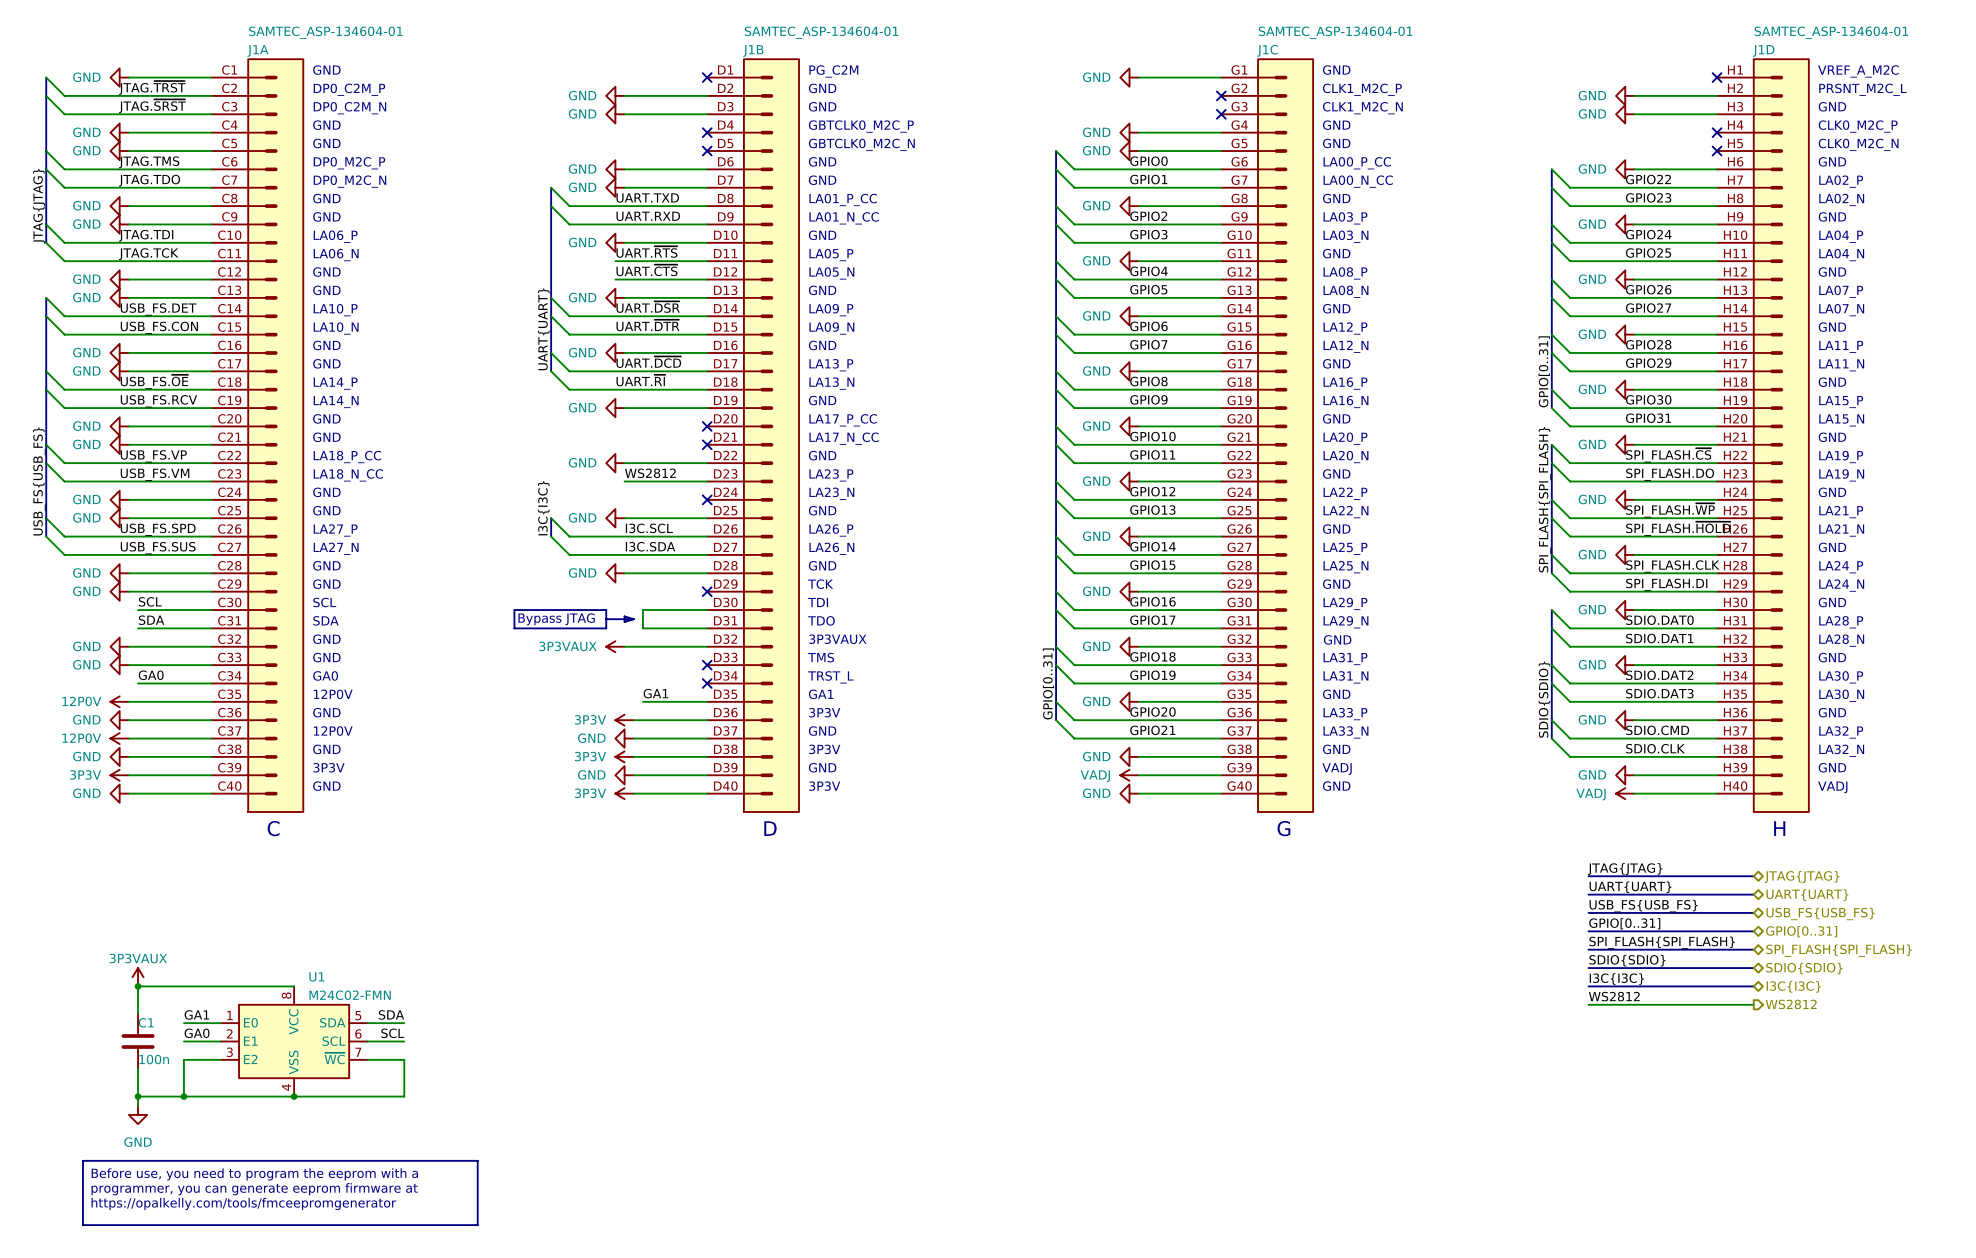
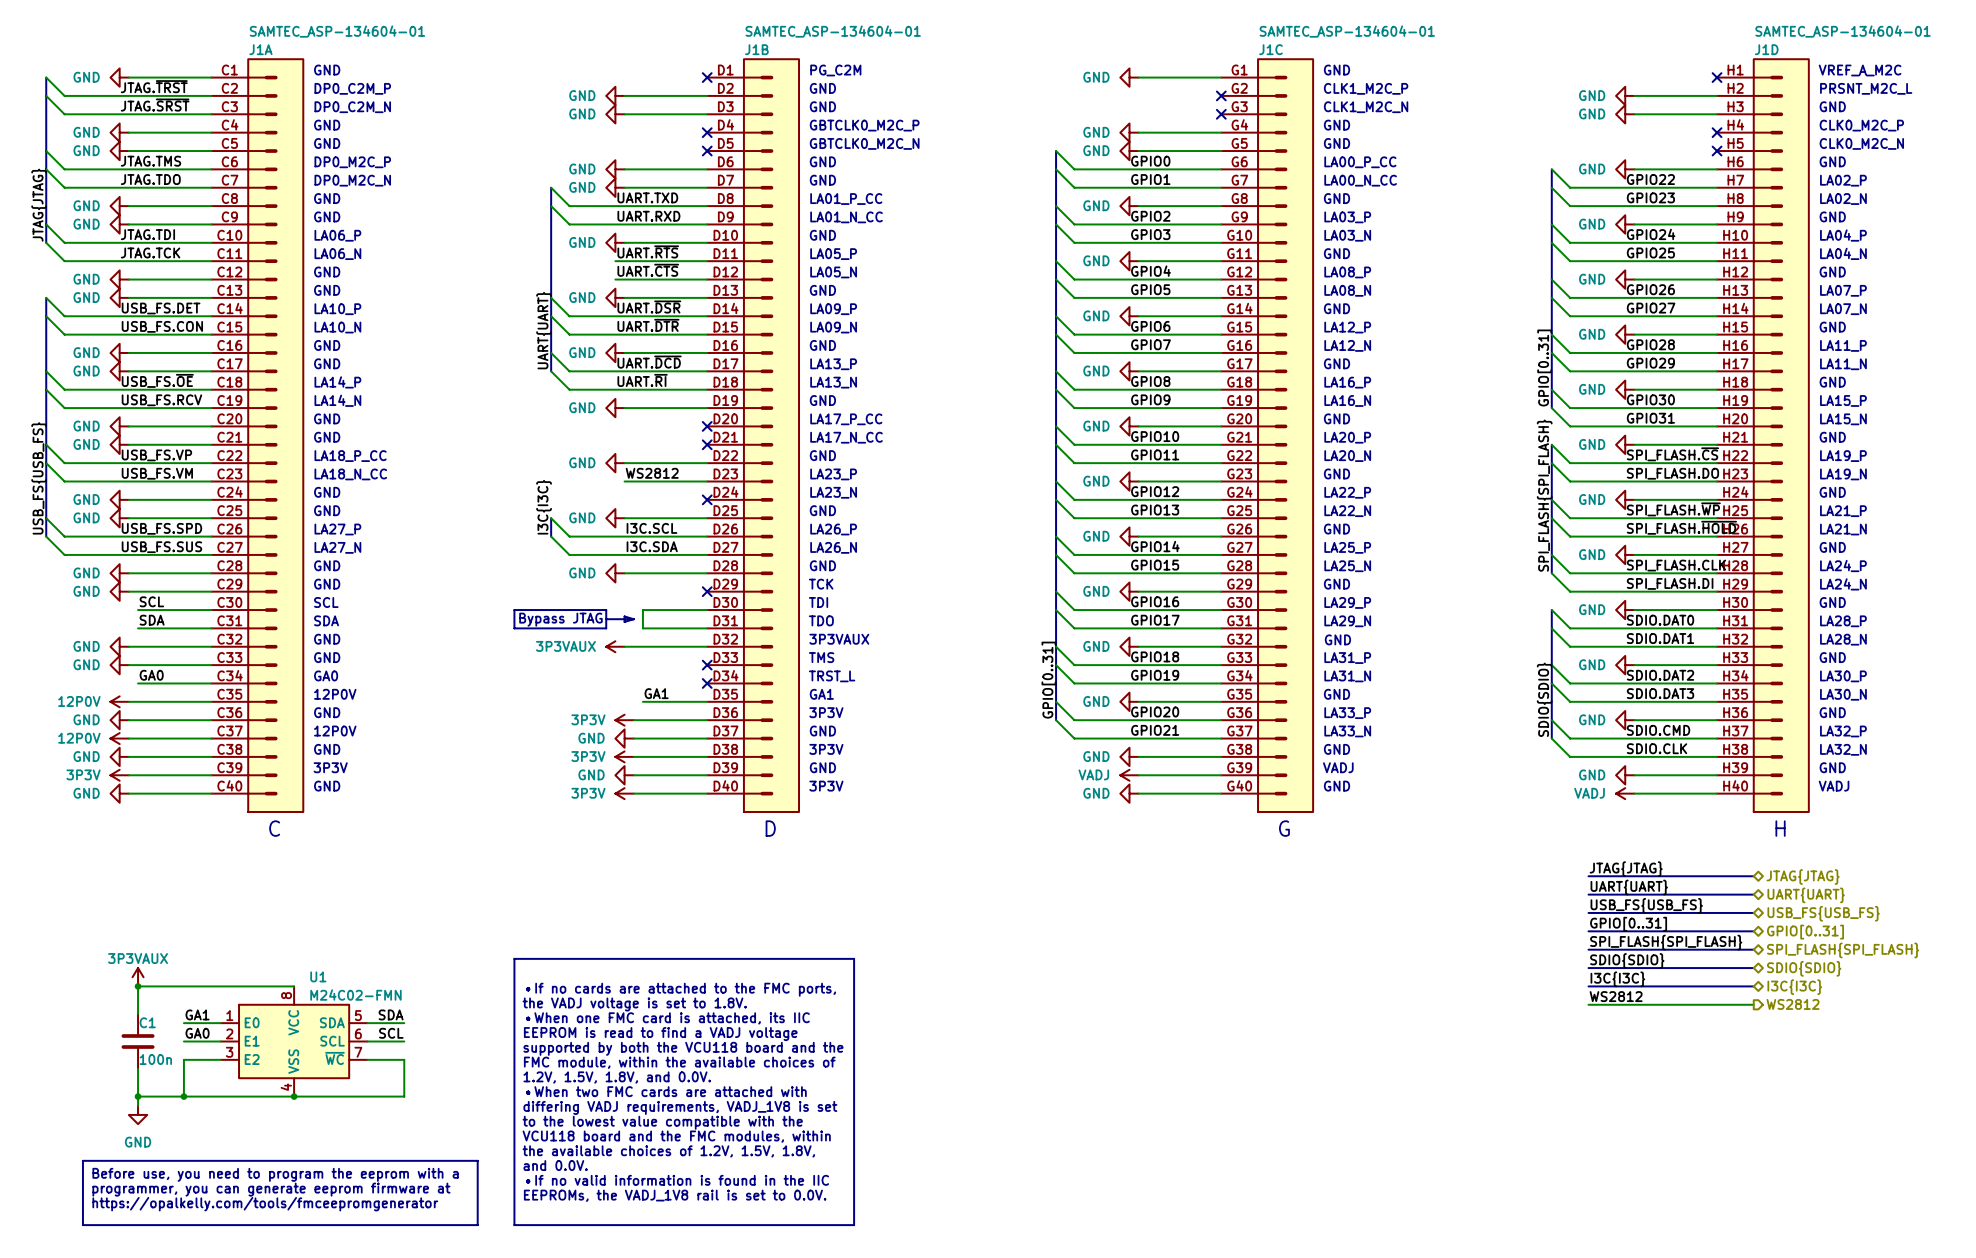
line: none -> (514, 958) (854, 958) (854, 1225) (514, 1225) (514, 958)
text: none -> •If no cards are attached to the FMC ports, (681, 989)
text: none -> the VADJ voltage is set to 1.8V. (634, 1004)
text: none -> •When one FMC card is attached, its IIC (667, 1018)
text: none -> EEPROM is read to find a VADJ voltage (660, 1034)
text: none -> supported by both the VCU118 board and the (683, 1048)
text: none -> FMC module, within the available choices of (679, 1062)
text: none -> 1.2V, 1.5V, 1.8V, and 0.0V. (617, 1077)
text: none -> •When two FMC cards are attached with (666, 1091)
text: none -> differing VADJ requirements, VADJ_1V8 is set (680, 1107)
text: none -> to the lowest value compatible with the (662, 1122)
text: none -> VCU118 board and the FMC modules, within (676, 1136)
text: none -> the available choices of 1.2V, 1.5V, 1.8V, (668, 1151)
text: none -> and 0.0V. (555, 1165)
text: none -> •If no valid information is found in the IIC (677, 1180)
text: none -> EEPROMs, the VADJ_1V8 rail is set to 0.0V. (675, 1195)

